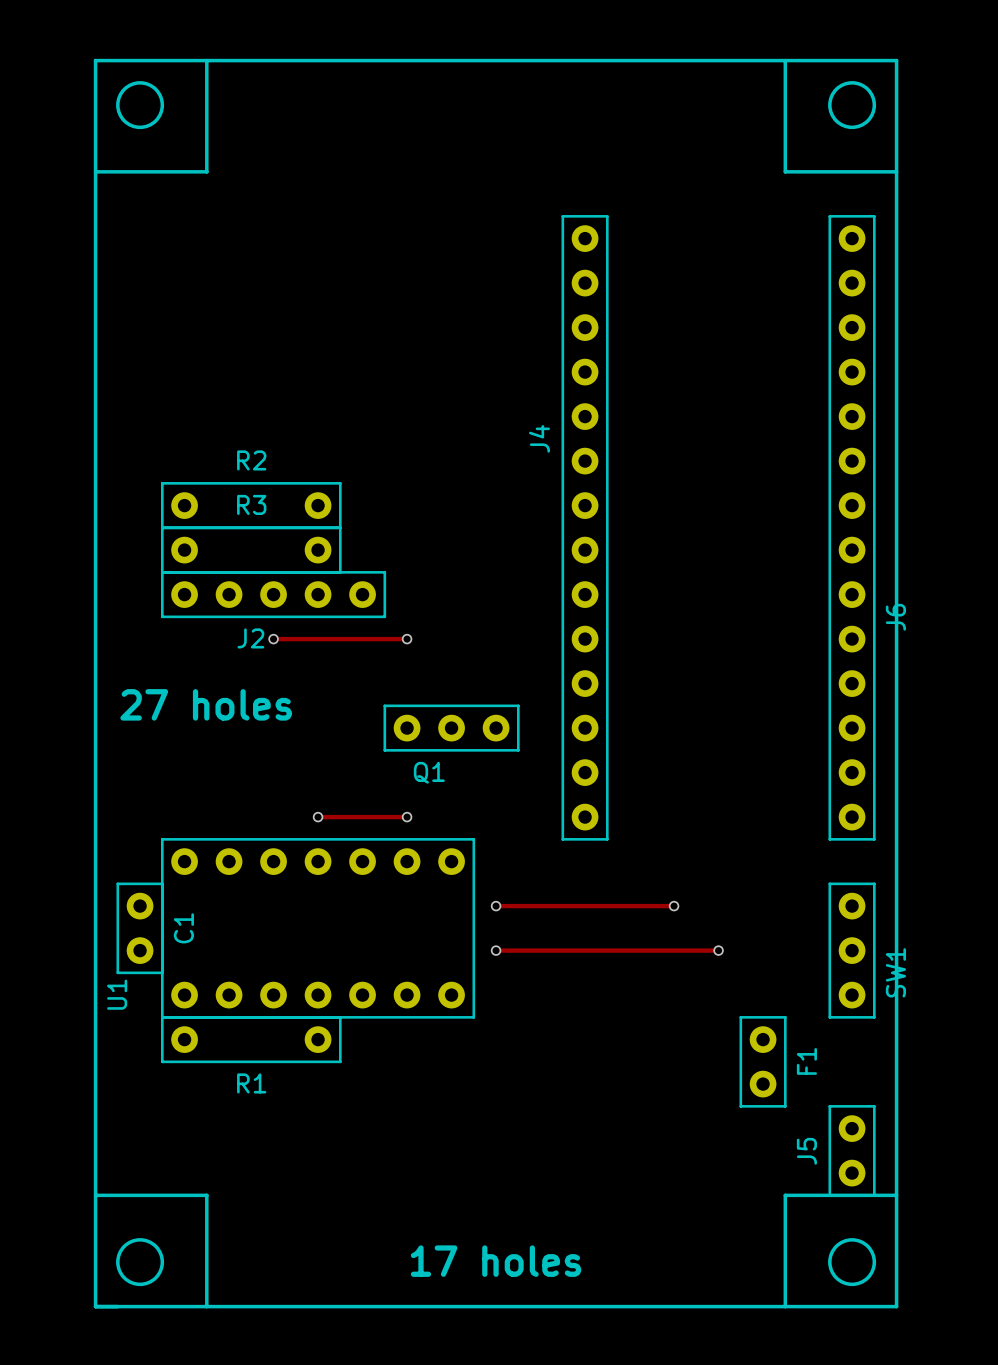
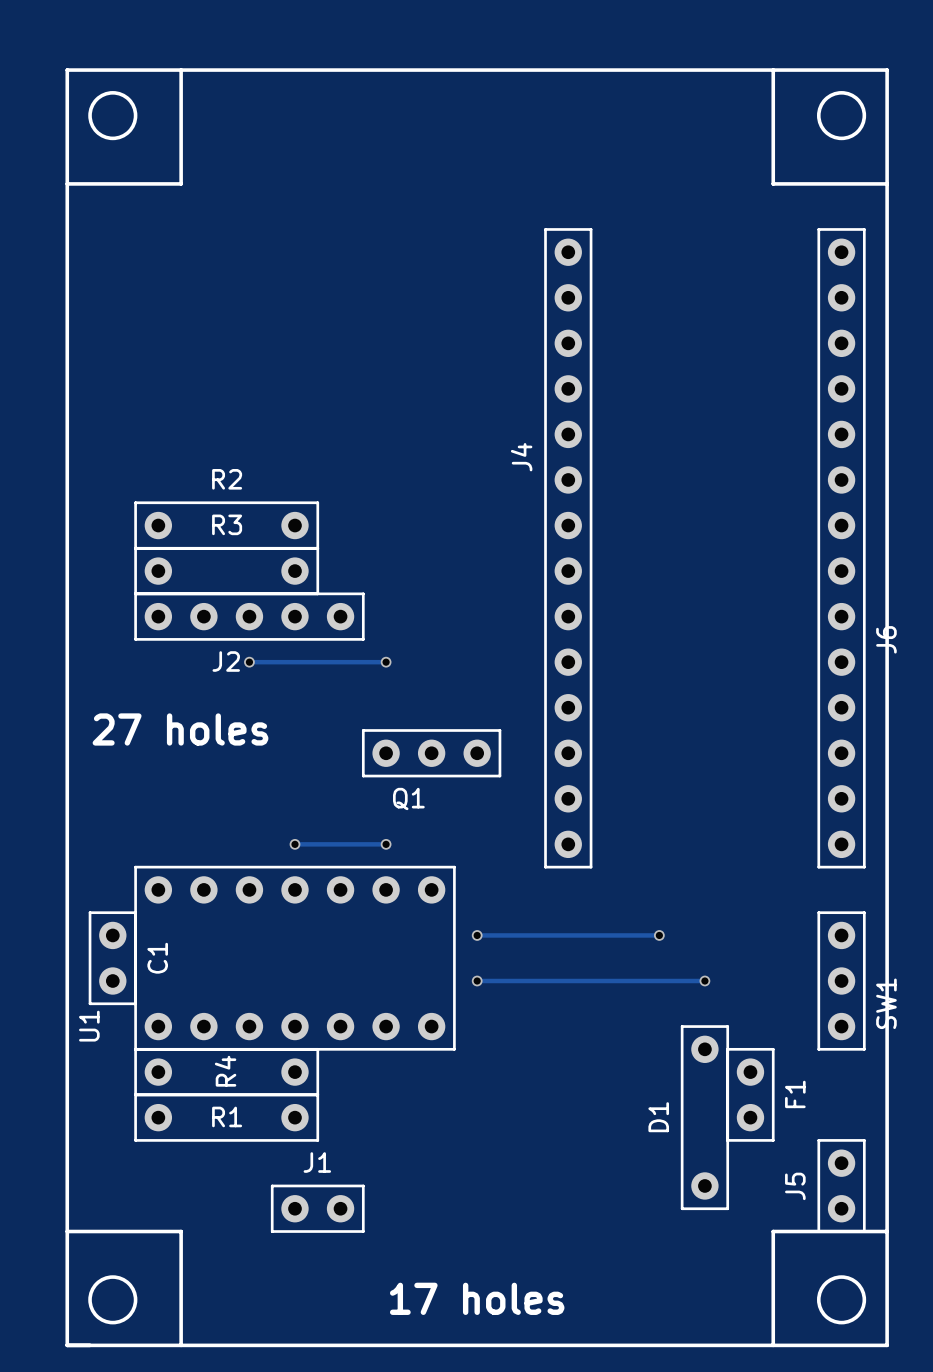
R4: none -> (226, 1117)
D1: none -> (704, 1117)
J1: none -> (317, 1208)

